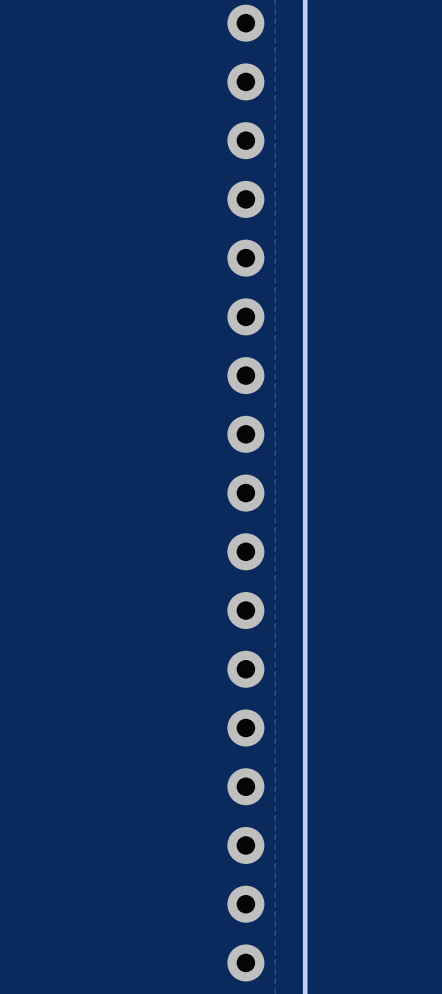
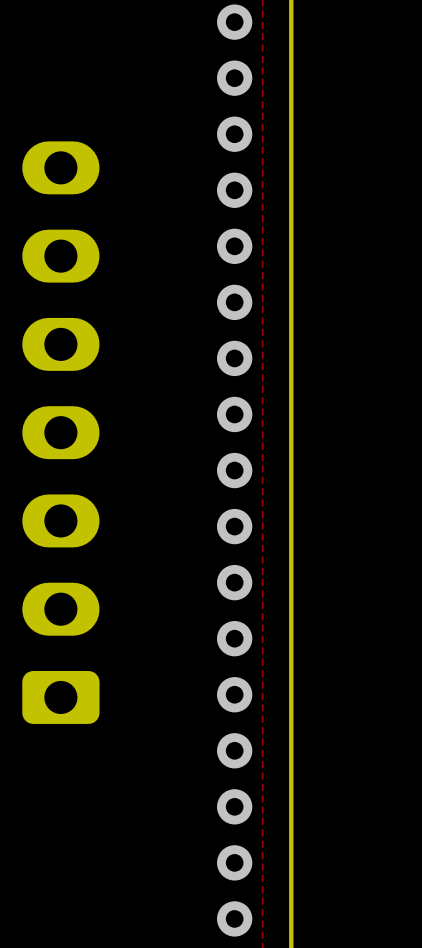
part: none -> (60, 432)

